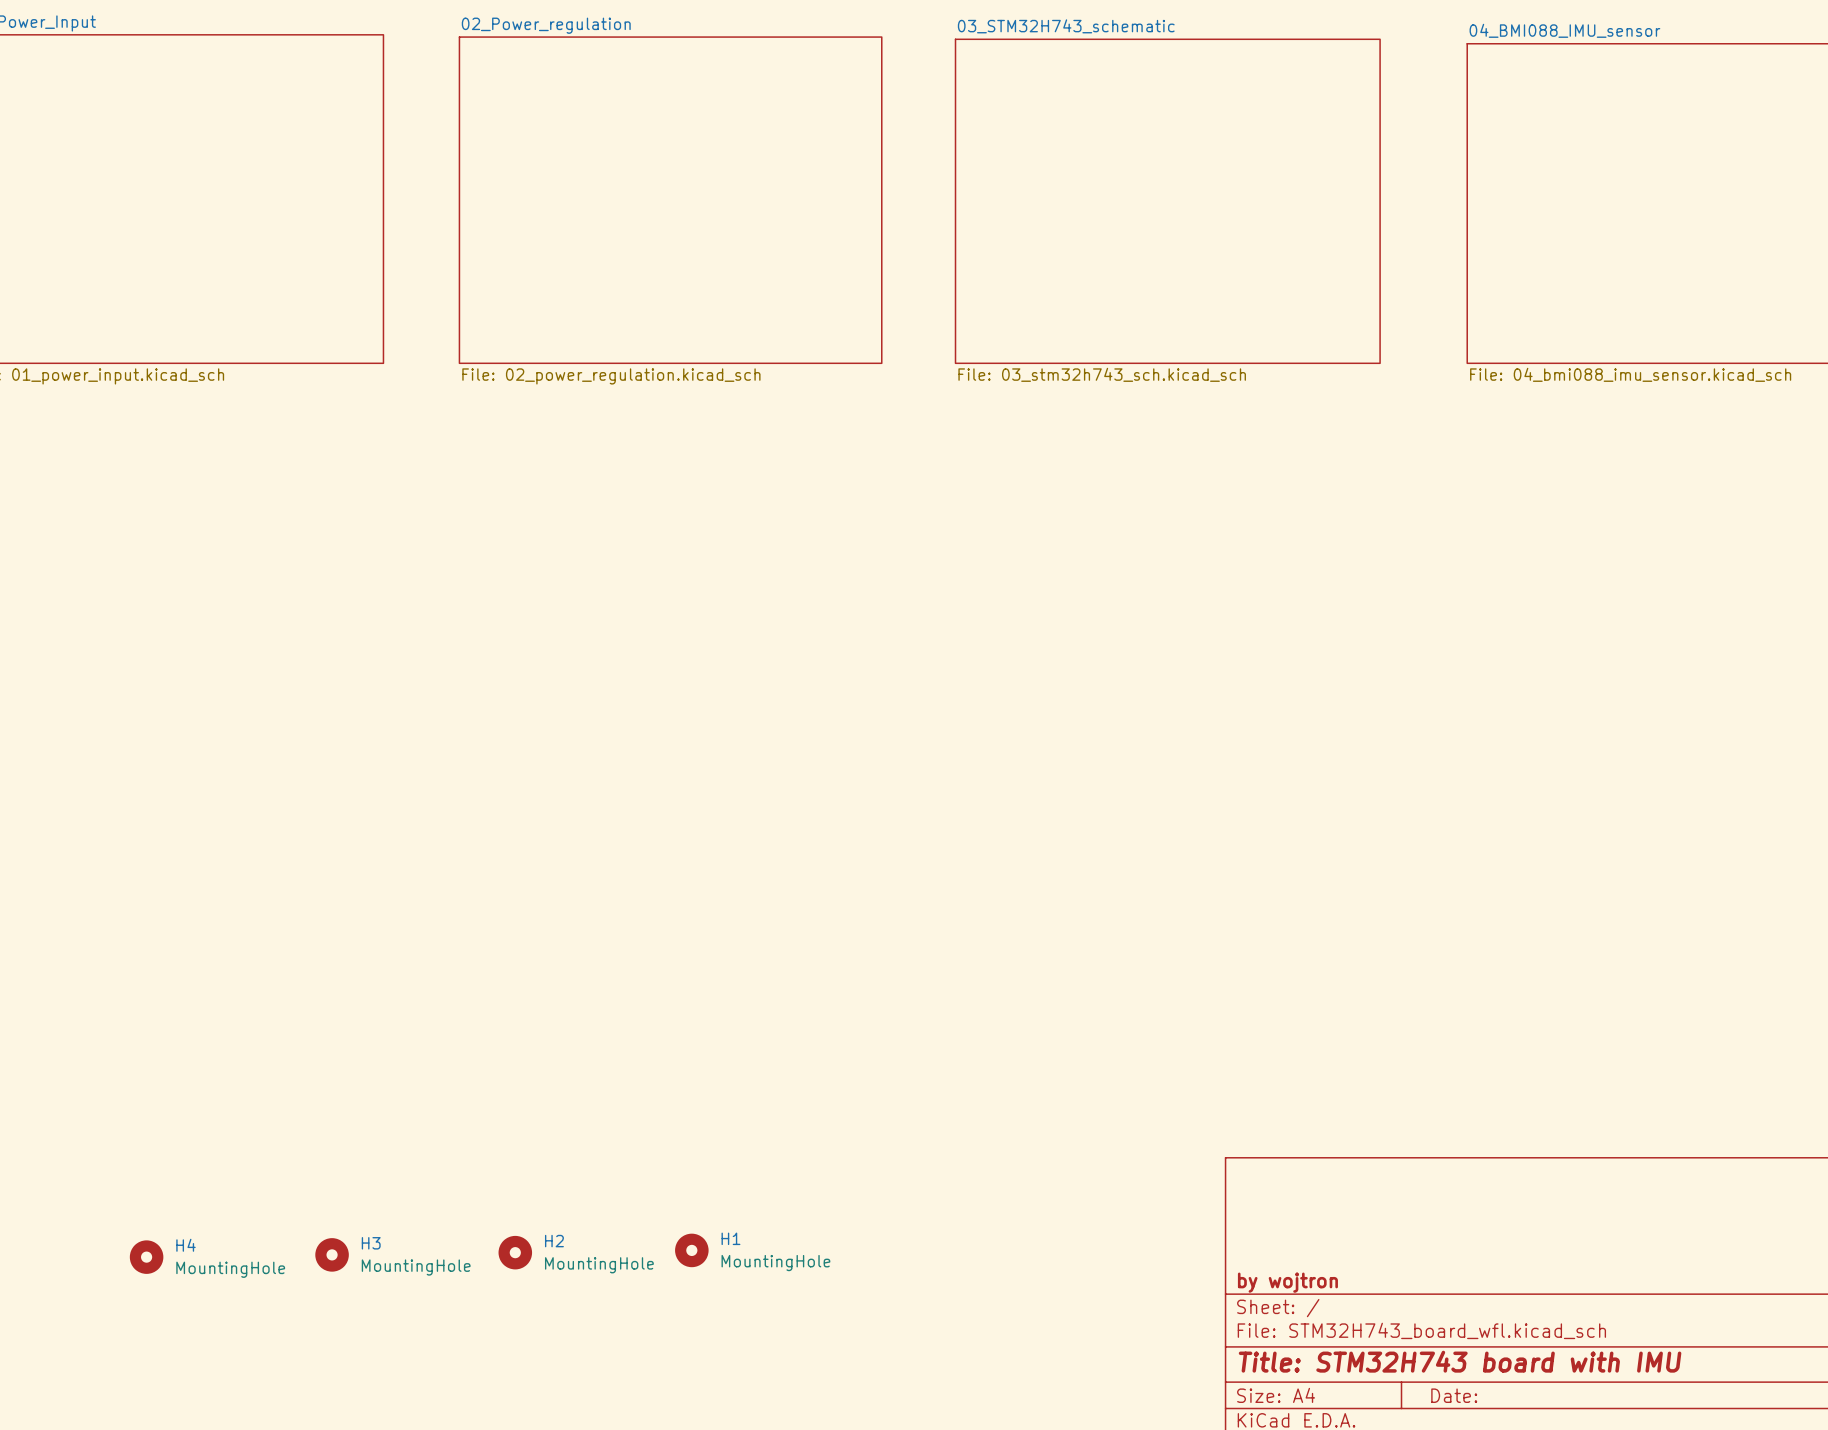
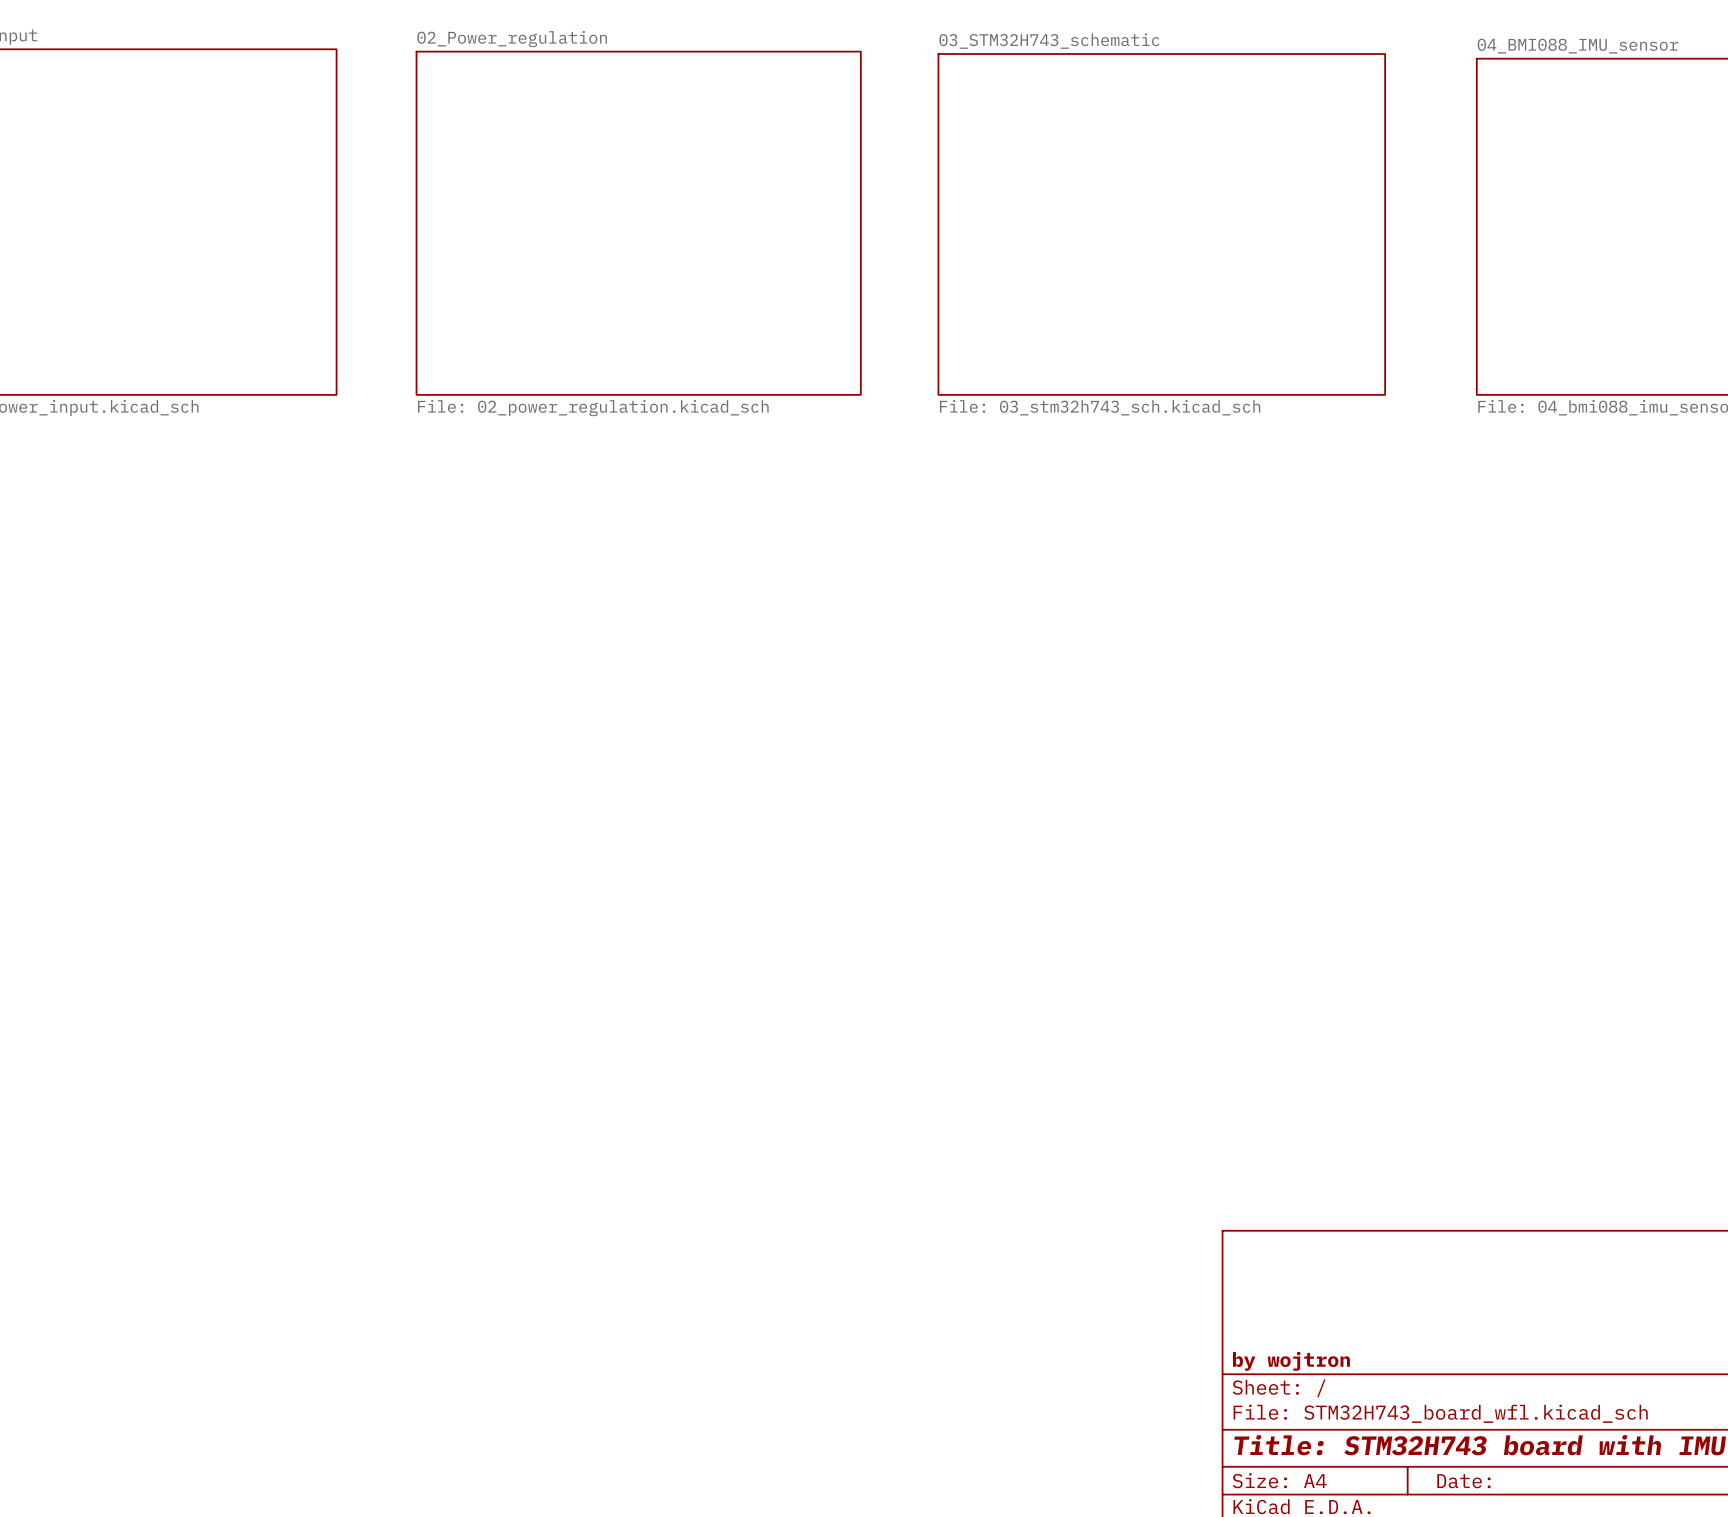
H1: MountingHole (691, 1250) -> none
H2: MountingHole (515, 1252) -> none
H3: MountingHole (332, 1254) -> none
H4: MountingHole (146, 1257) -> none

